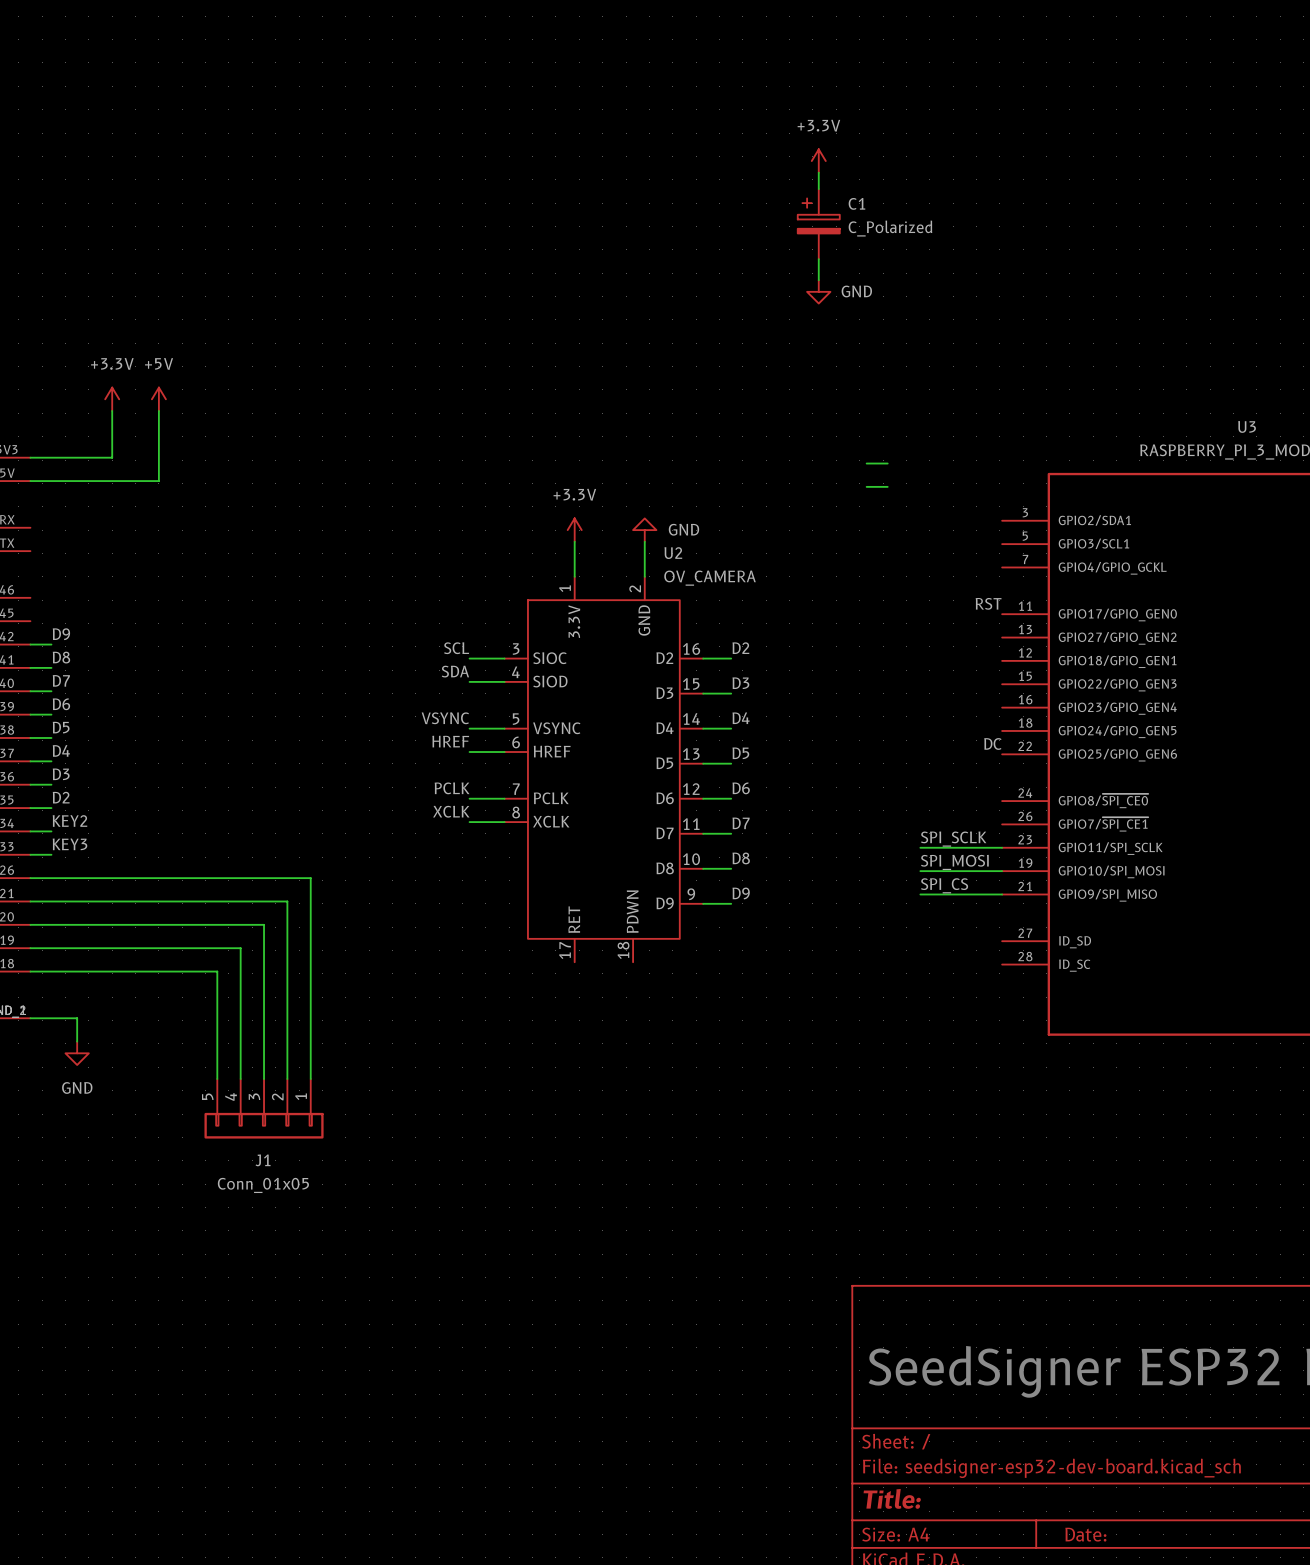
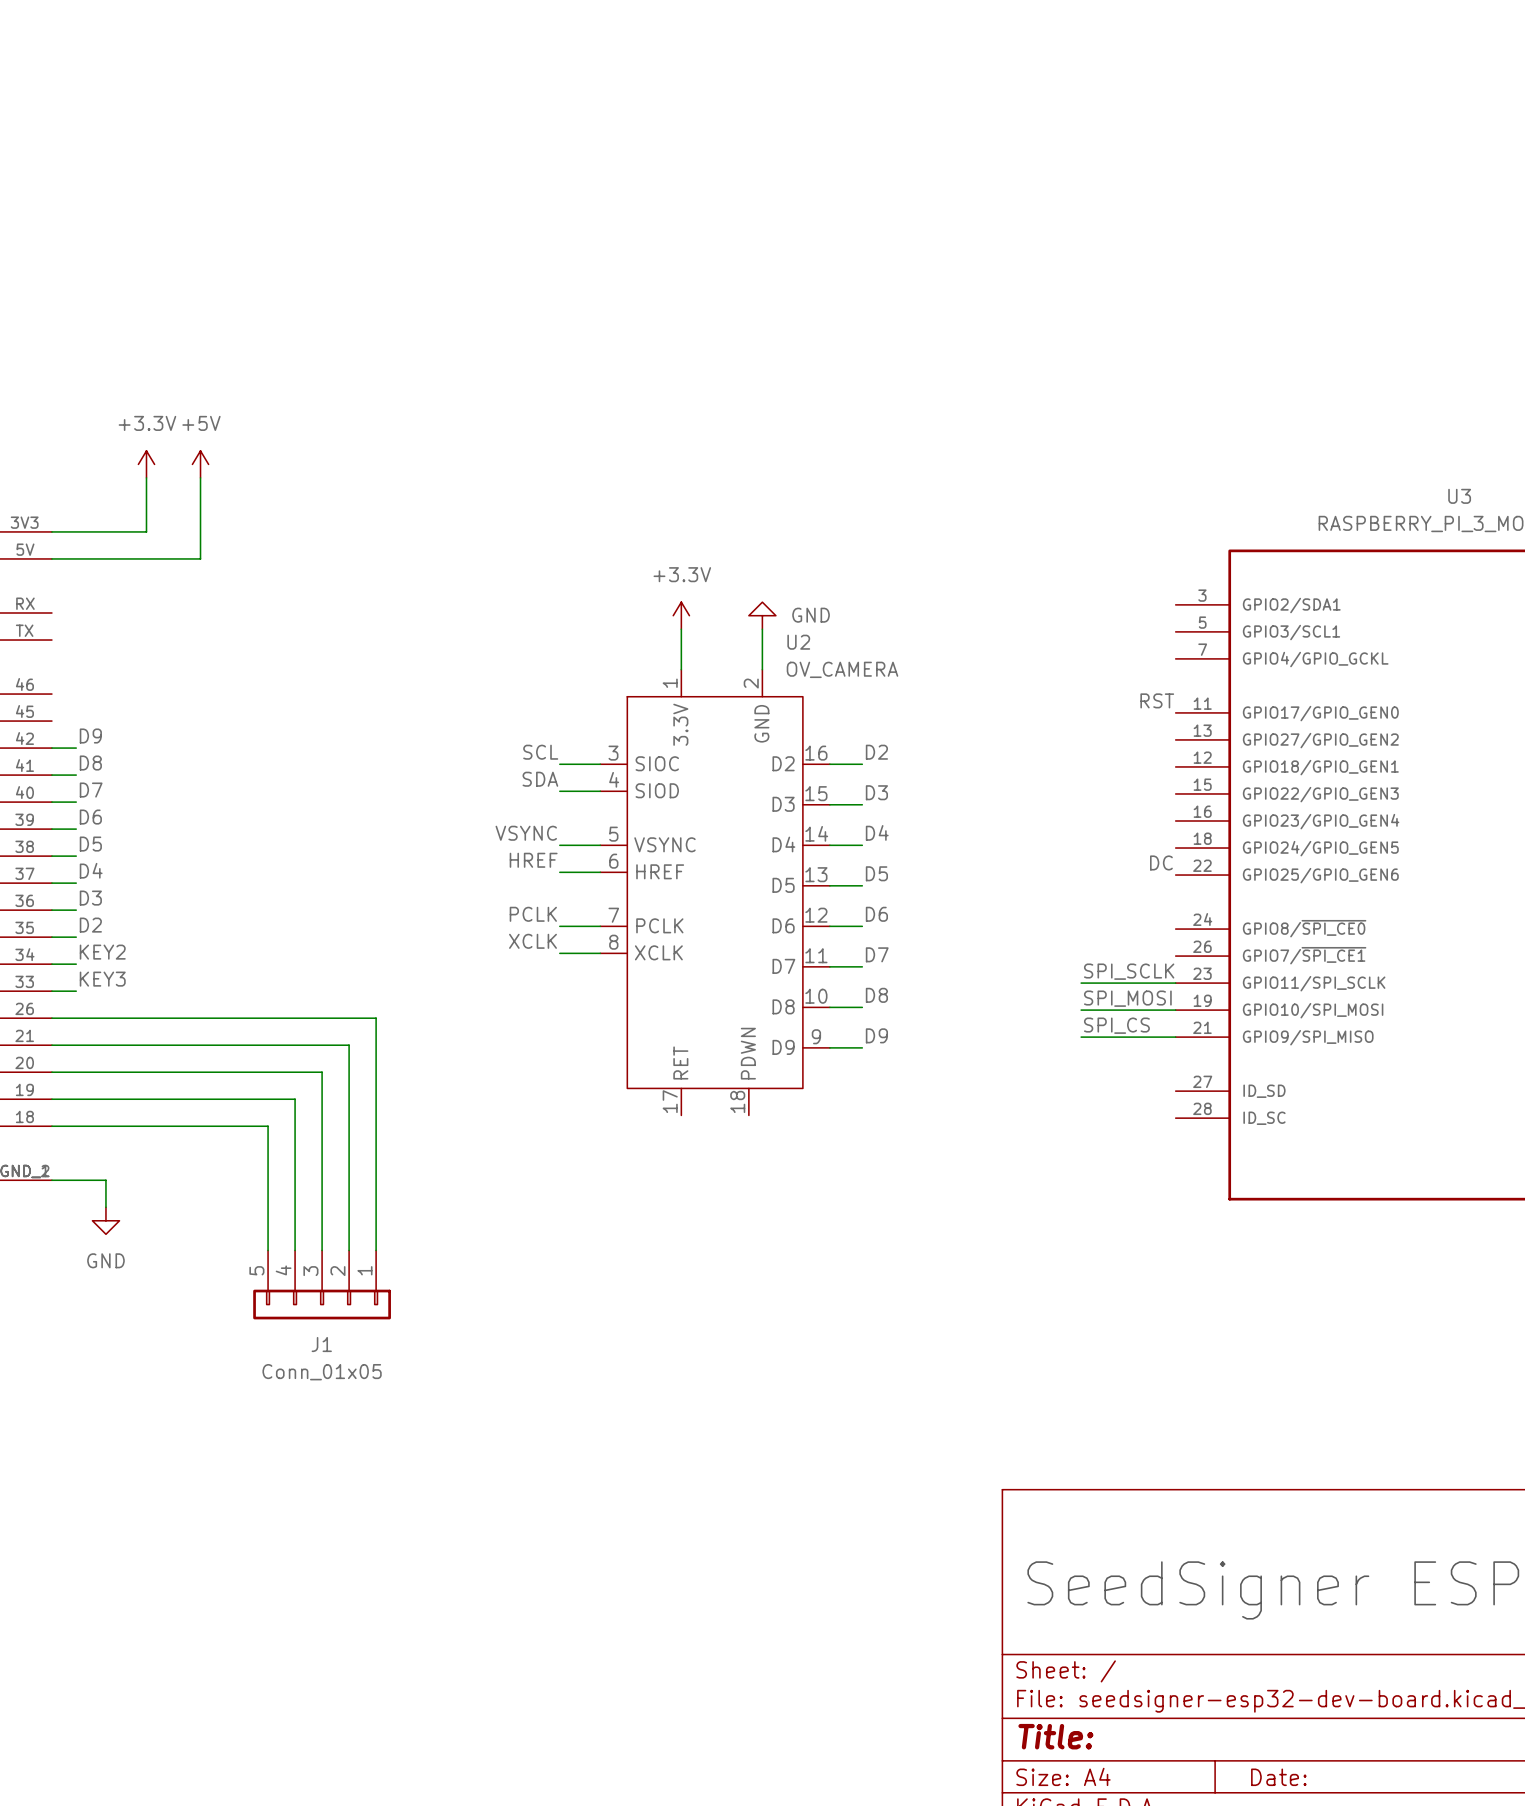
power symbol: +3.3V (818, 161) -> none
wire: (818, 172) (818, 189) -> none
C1: C_Polarized (818, 224) -> none
wire: (818, 259) (818, 280) -> none
power symbol: GND (818, 291) -> none
wire: (866, 463) (887, 463) -> none
wire: (866, 486) (887, 486) -> none

